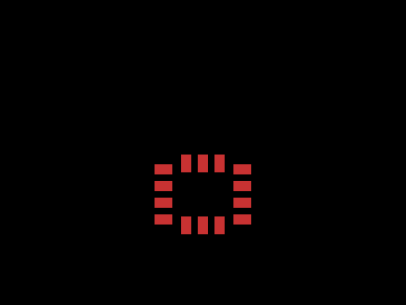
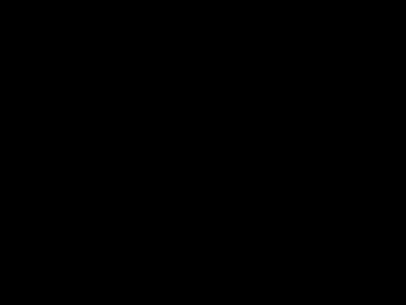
part: (202, 194) -> none

